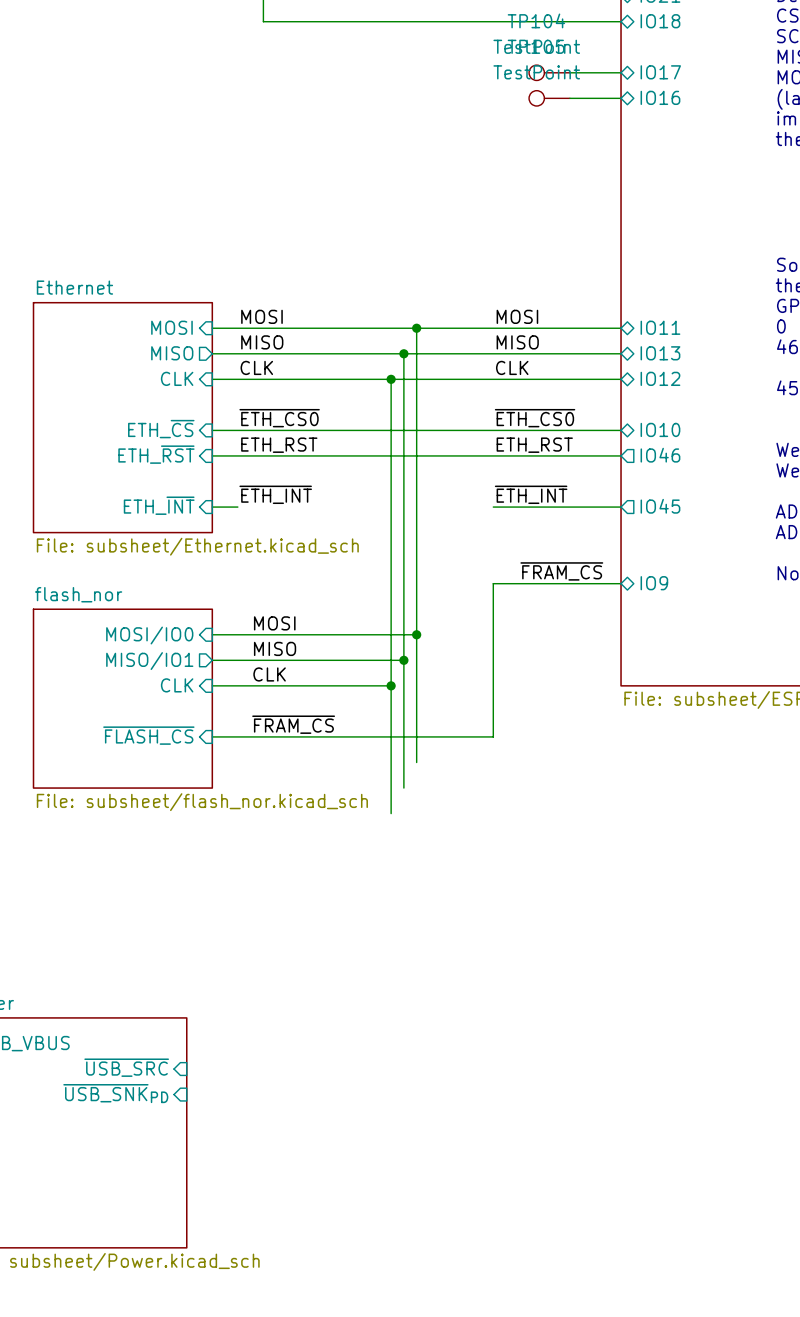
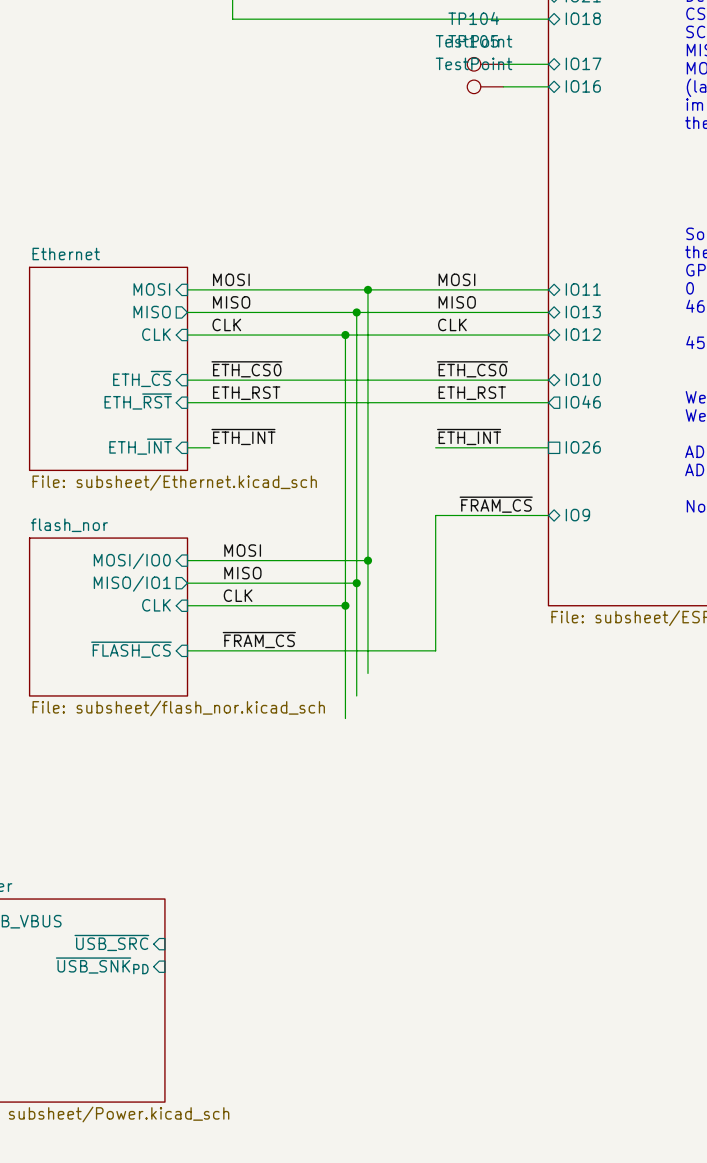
sheet pin shape: output (660, 506) -> passive (583, 447)
sheet pin: IO45 (660, 506) -> IO26 (583, 447)

